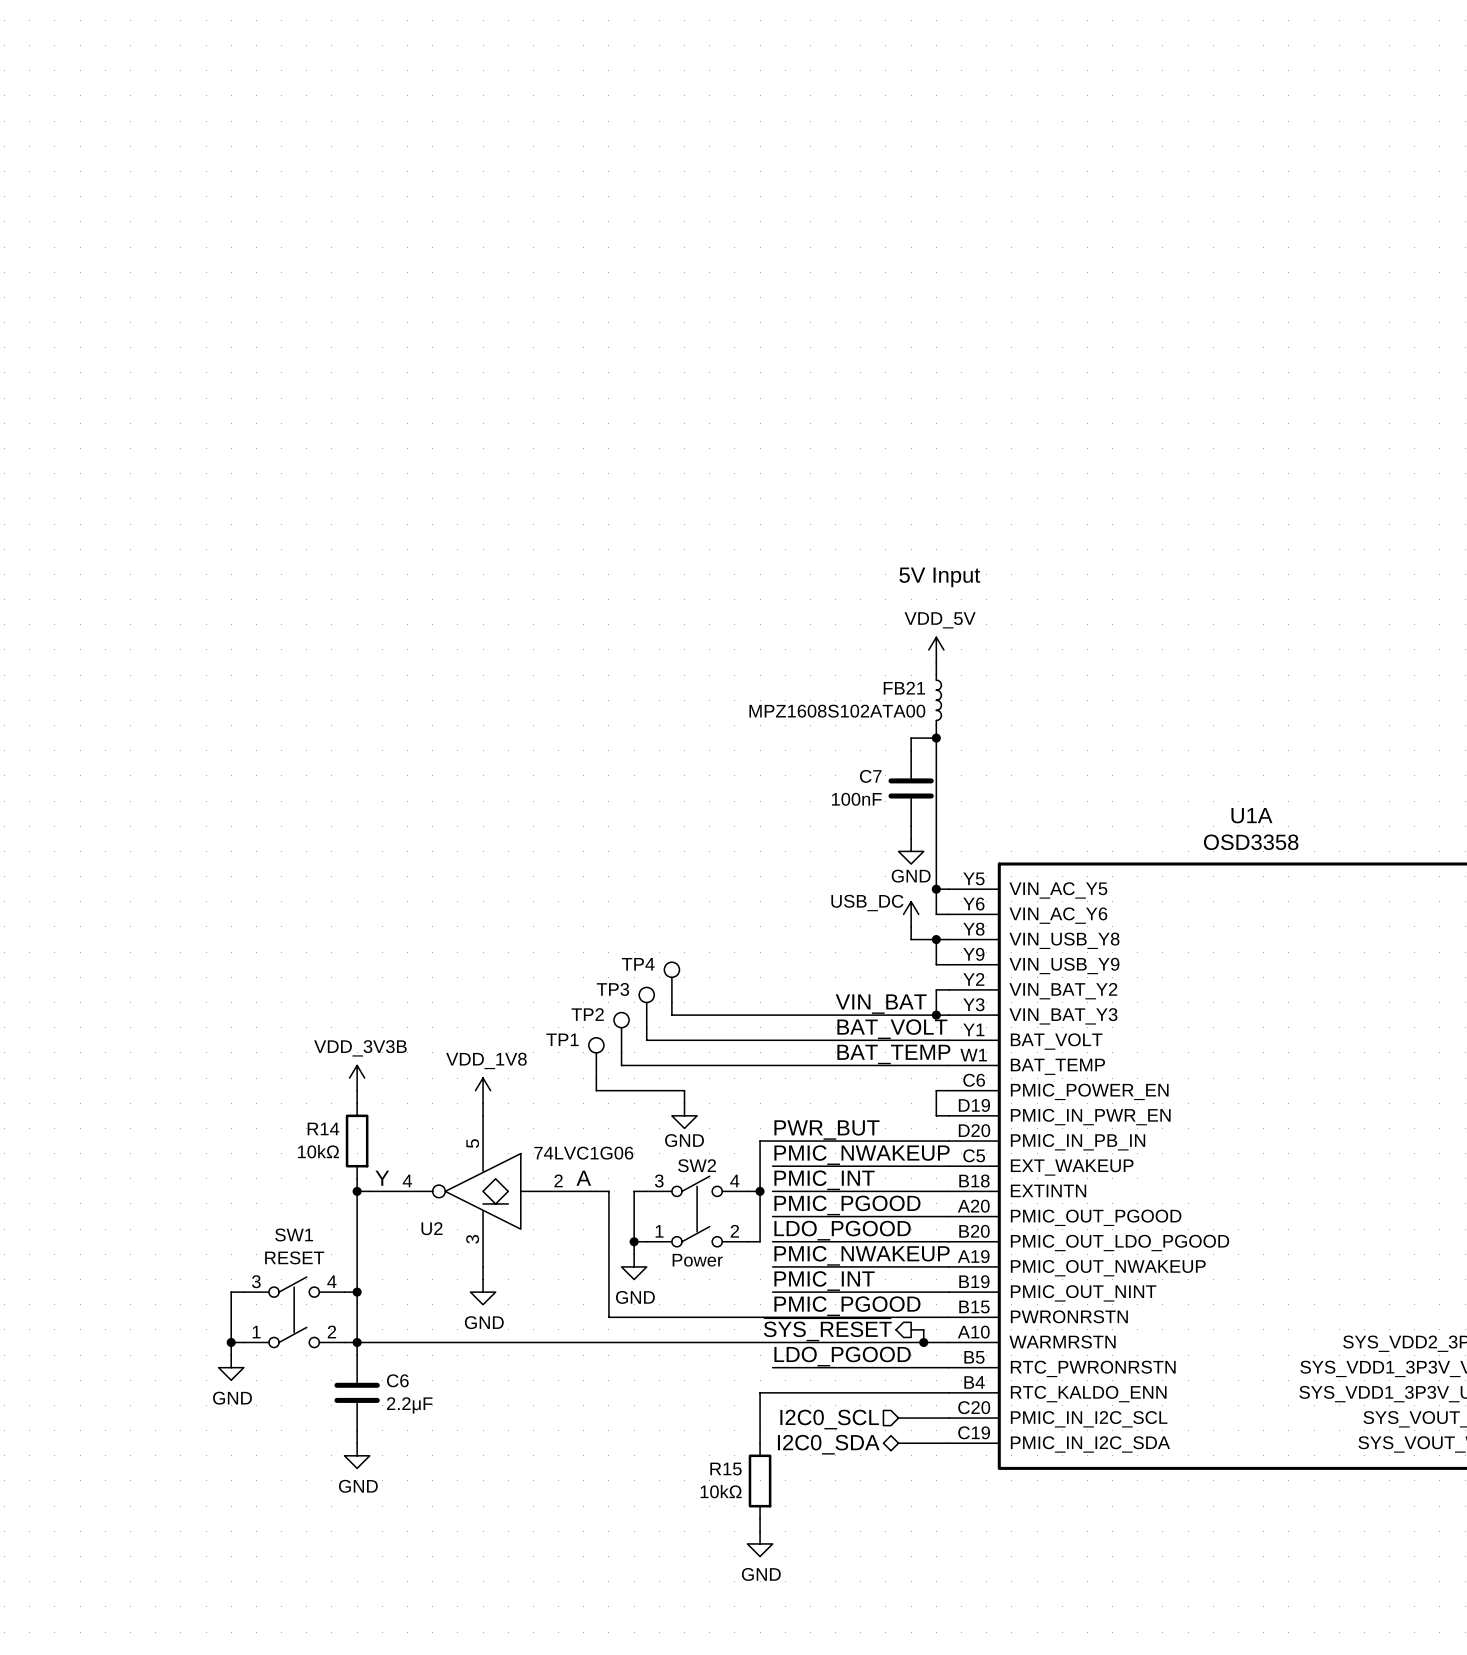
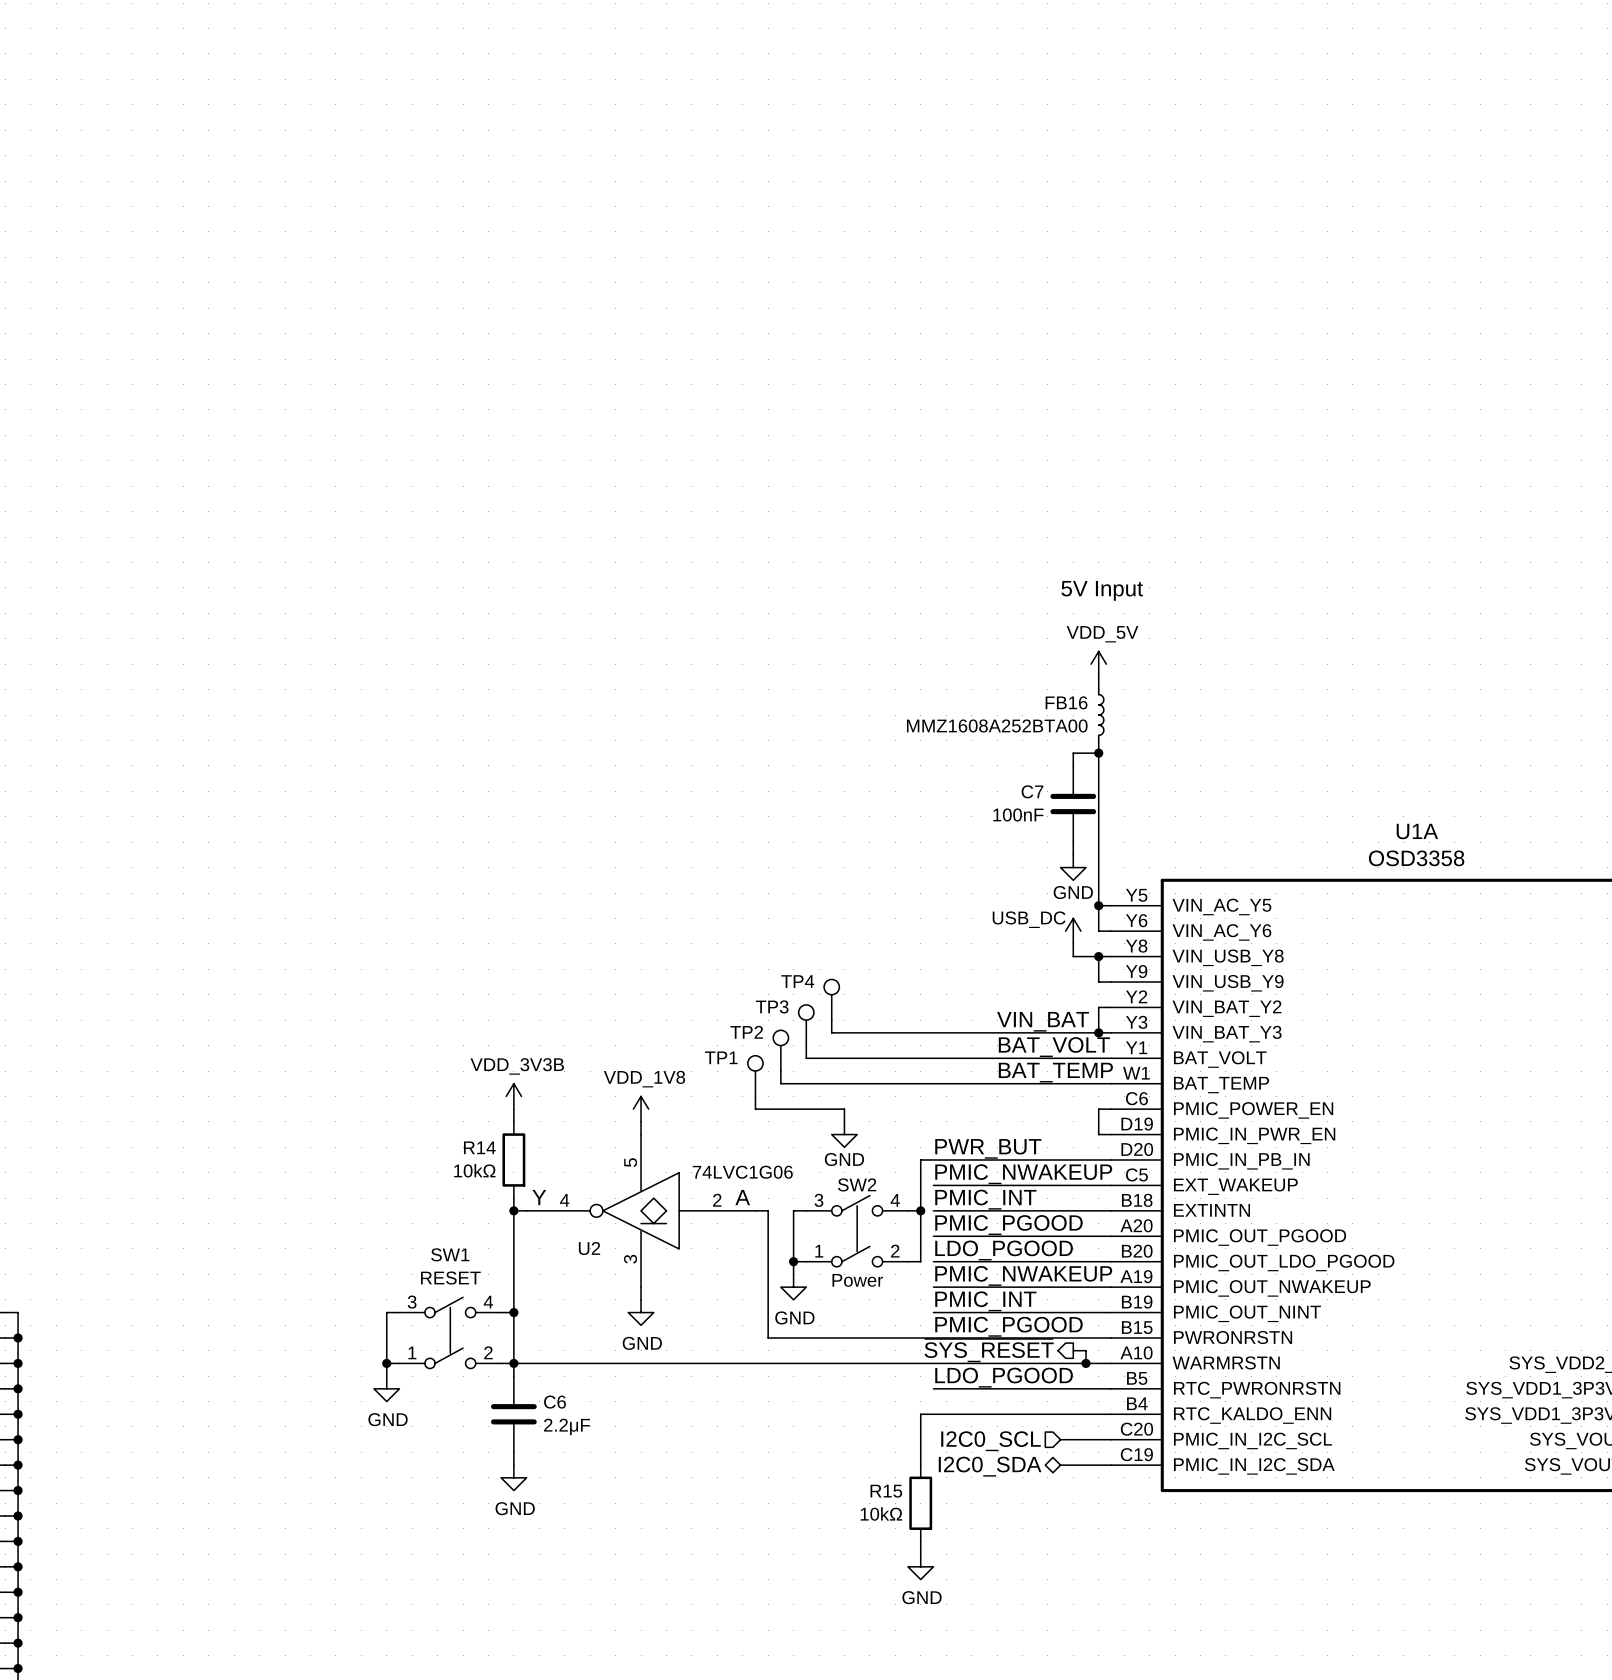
FB21 name: FB21 (904, 688) -> FB16 (1066, 702)
FB21 value: MPZ1608S102ATA00 (837, 711) -> MMZ1608A252BTA00 (997, 725)

